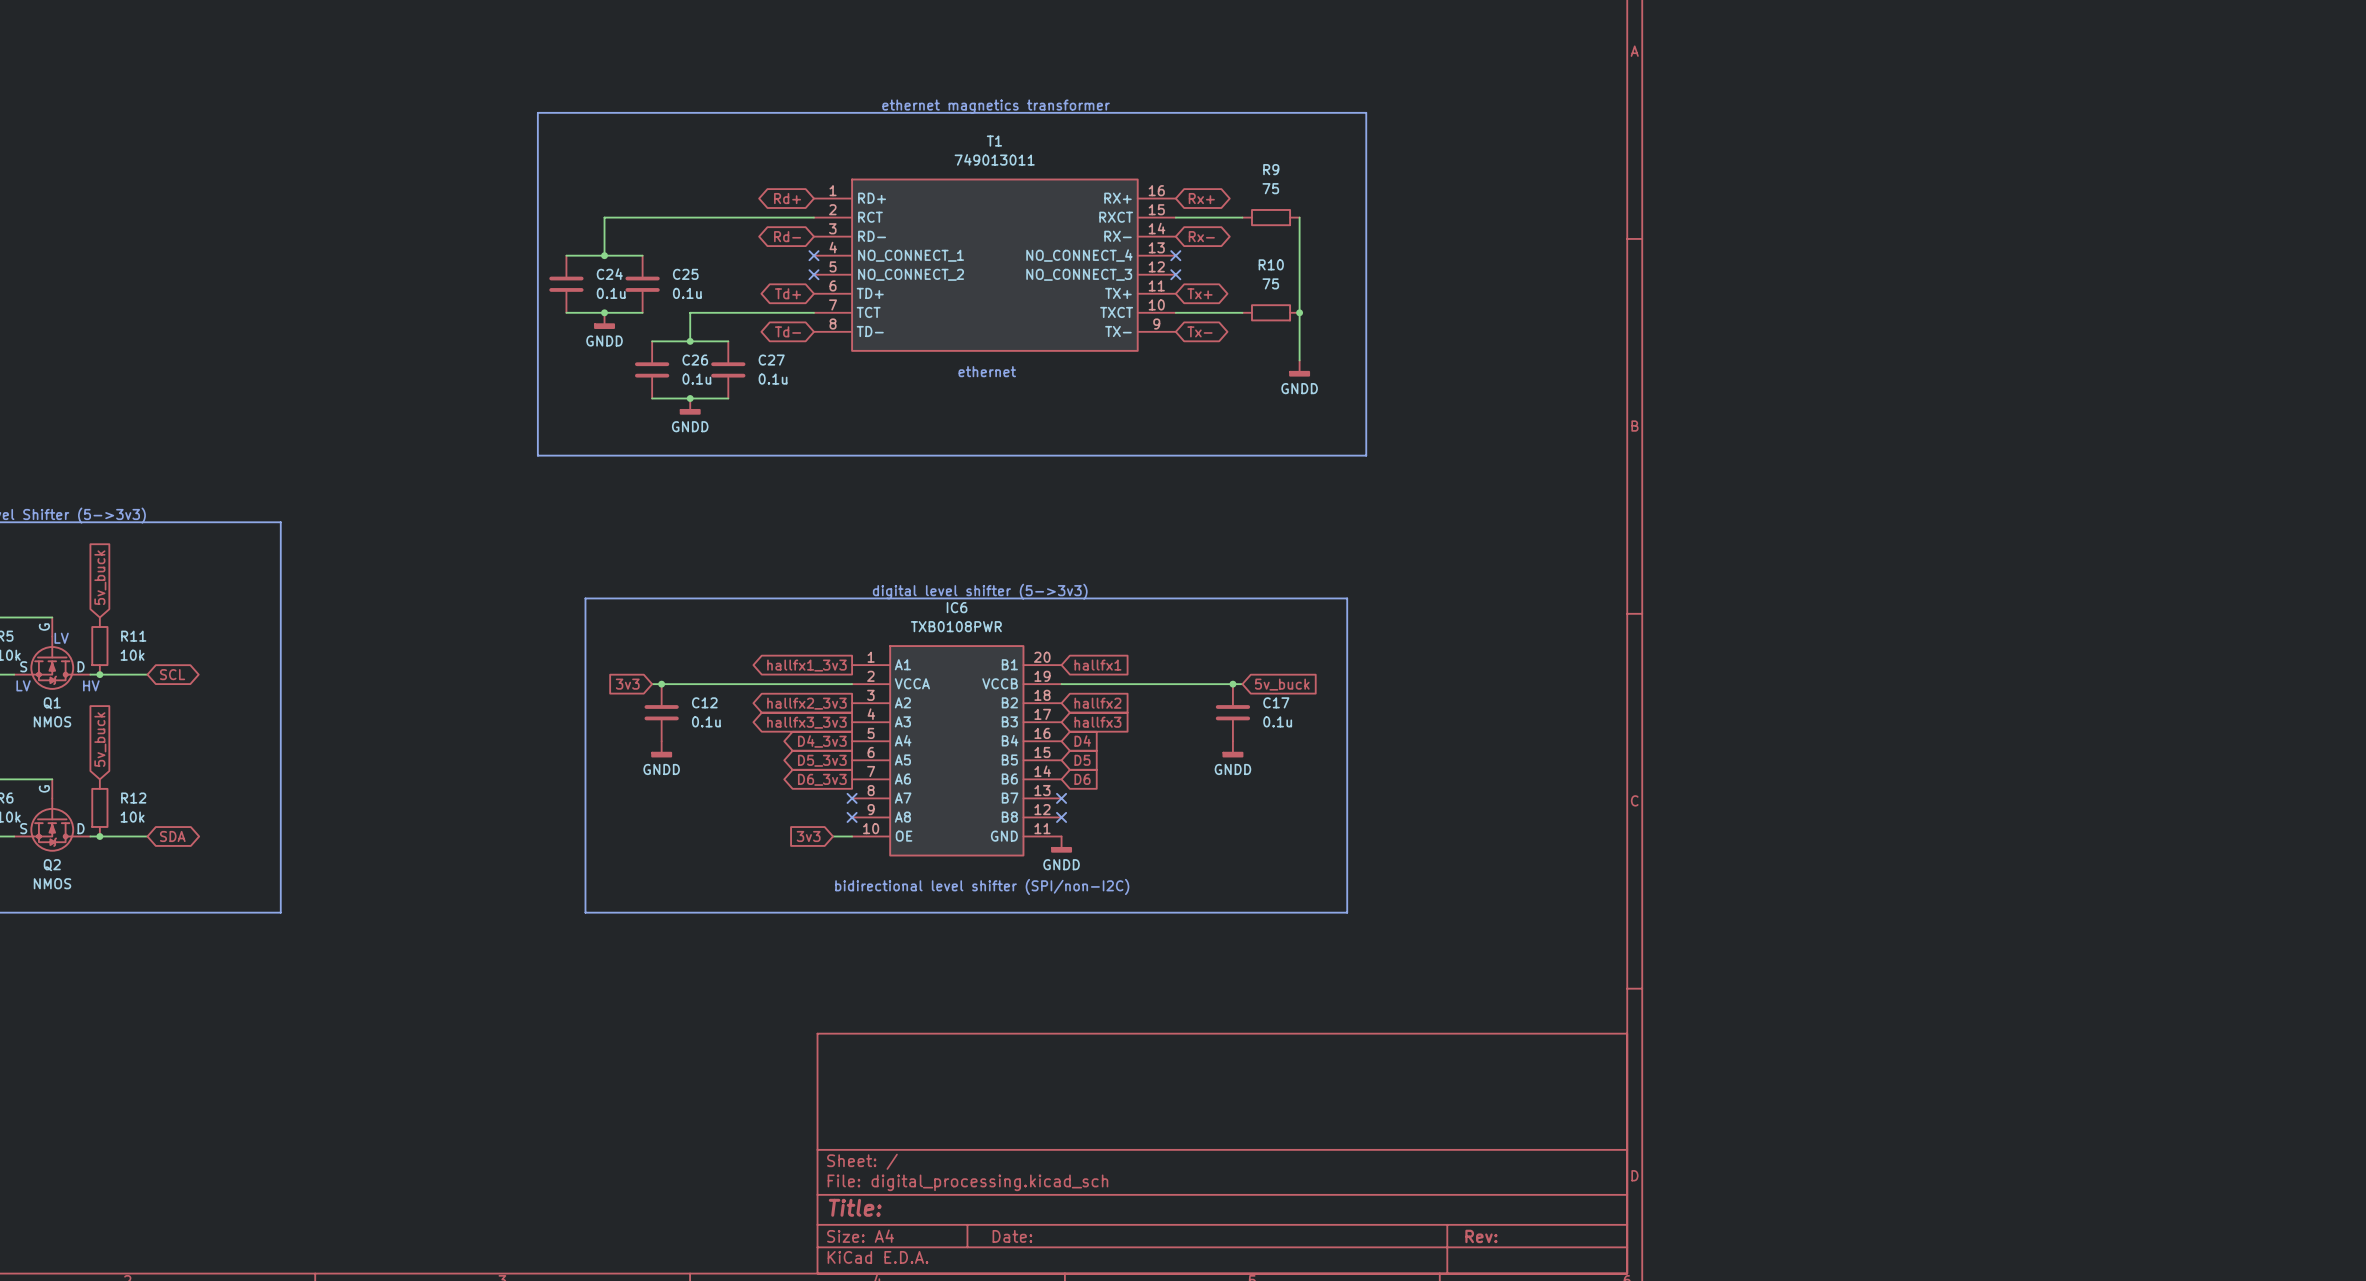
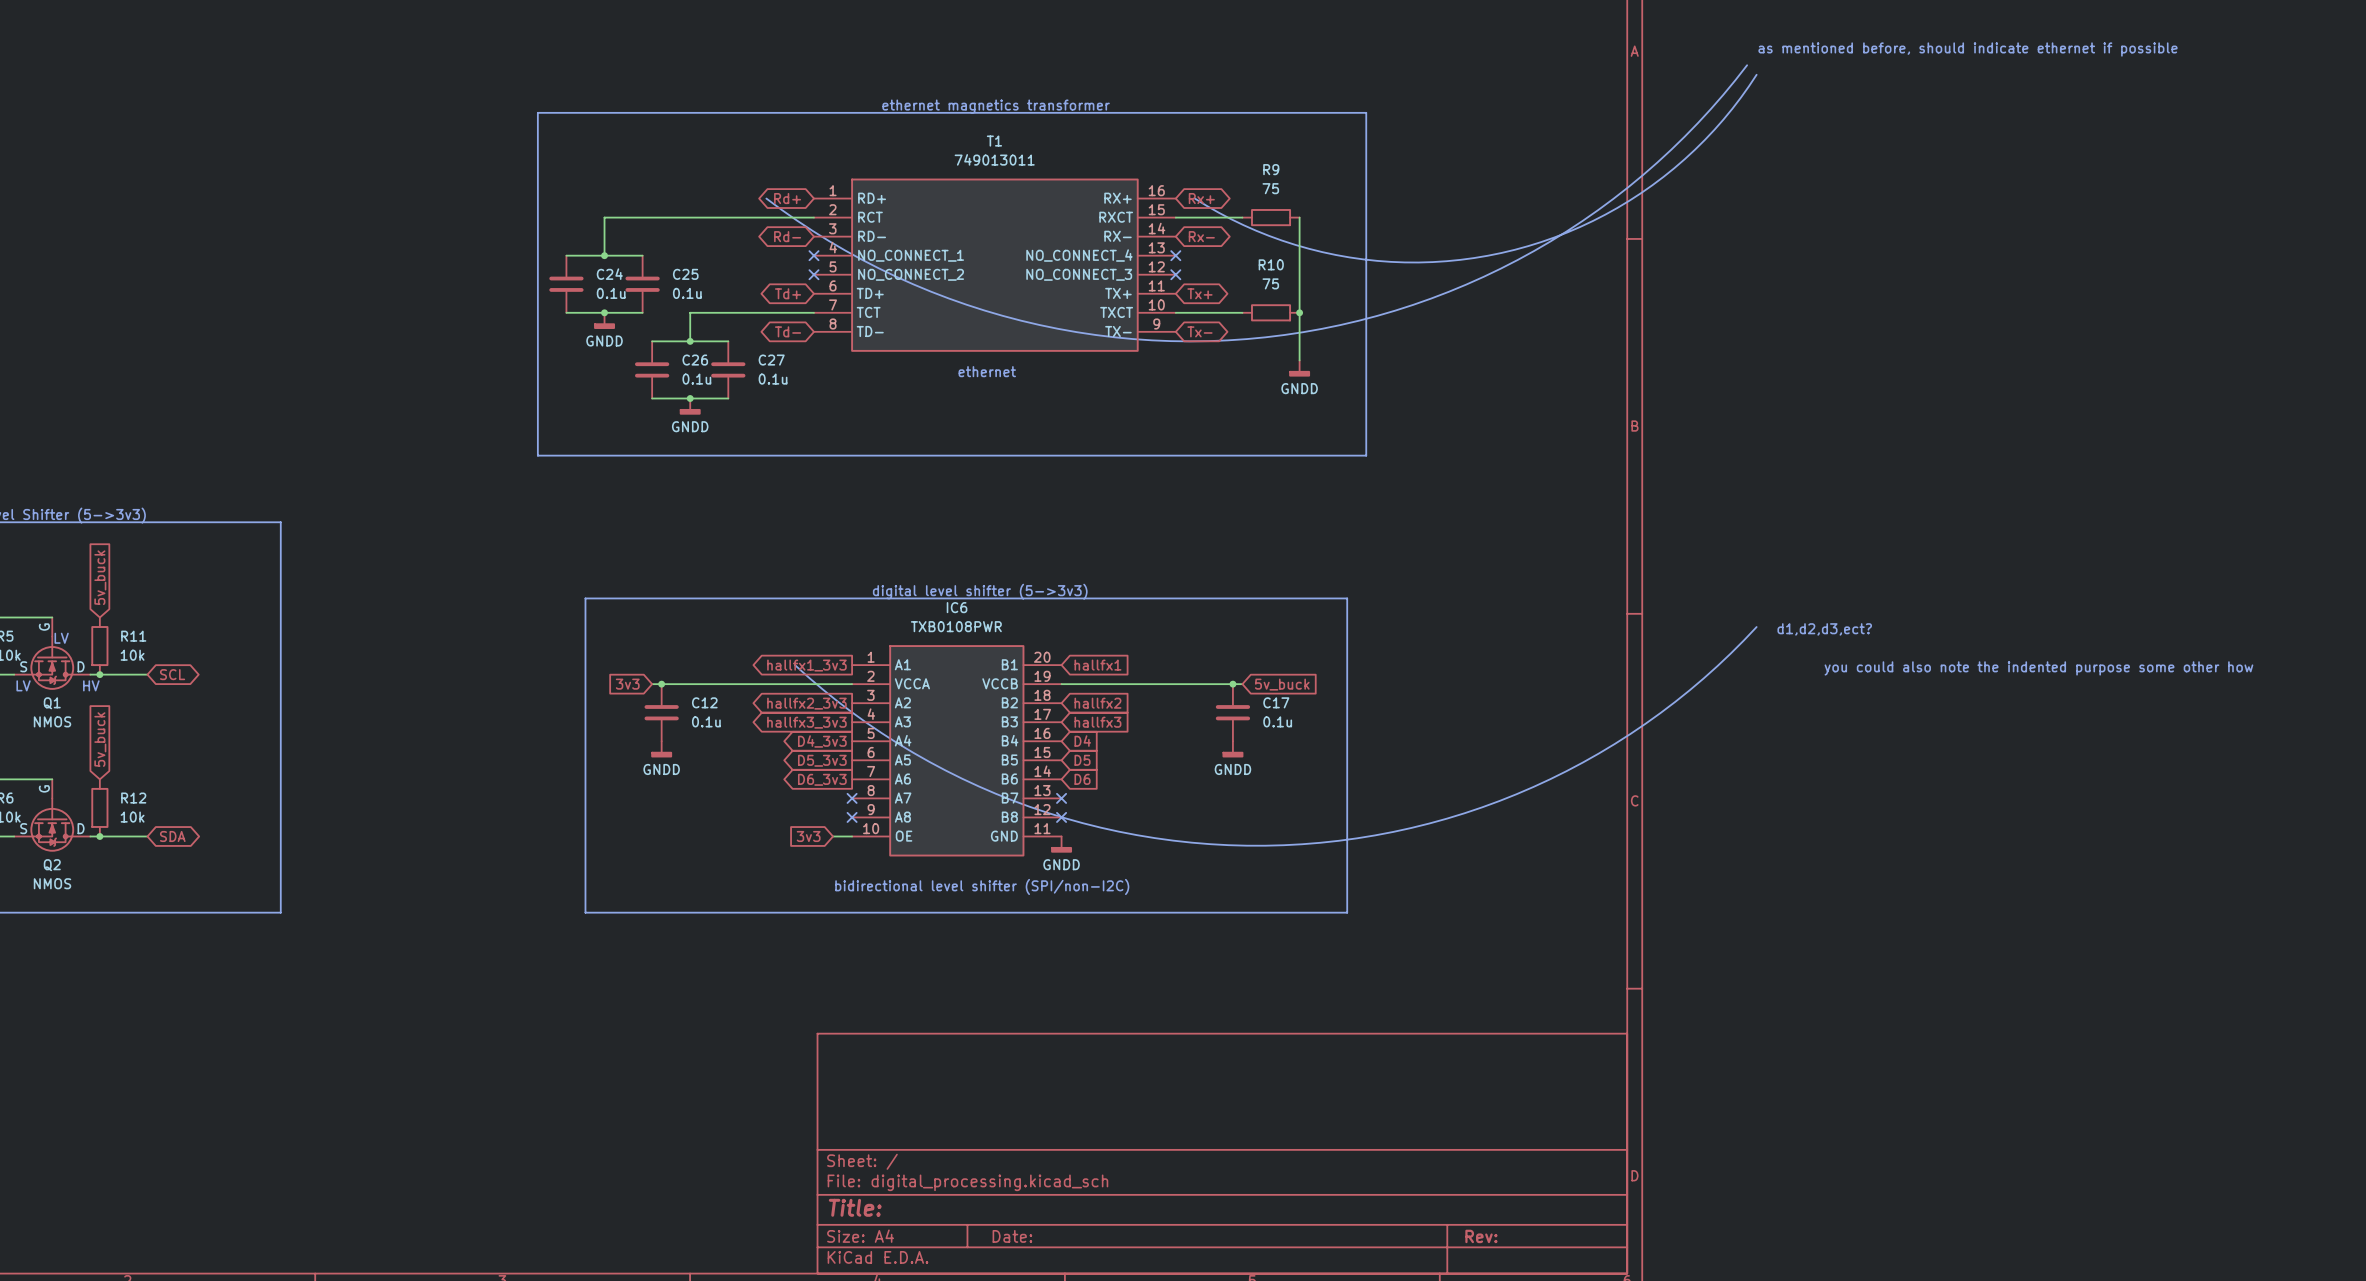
text: none -> as mentioned before, should indicate ethernet if possible (1967, 49)
line: none -> (1747, 65) (1698, 122) (1657, 162) (1613, 198) (1550, 241) (1500, 268) (1431, 298) (1358, 320) (1284, 335) (1208, 341) (1133, 339) (1076, 332) (1002, 315) (948, 298) (878, 268) (812, 231) (766, 198)
line: none -> (1756, 74) (1732, 108) (1704, 139) (1652, 185) (1617, 207) (1580, 226) (1541, 241) (1501, 253) (1460, 259) (1418, 262) (1377, 260) (1335, 254) (1295, 244) (1256, 230) (1194, 198)
line: none -> (1756, 627) (1703, 678) (1645, 723) (1599, 753) (1533, 786) (1482, 807) (1411, 827) (1357, 838) (1283, 845) (1228, 845) (1155, 838) (1082, 823) (1030, 806) (962, 778) (913, 752) (851, 712) (794, 665)
text: none -> d1,d2,d3,ect? (1824, 629)
text: none -> you could also note the indented purpose some other how (2038, 668)

